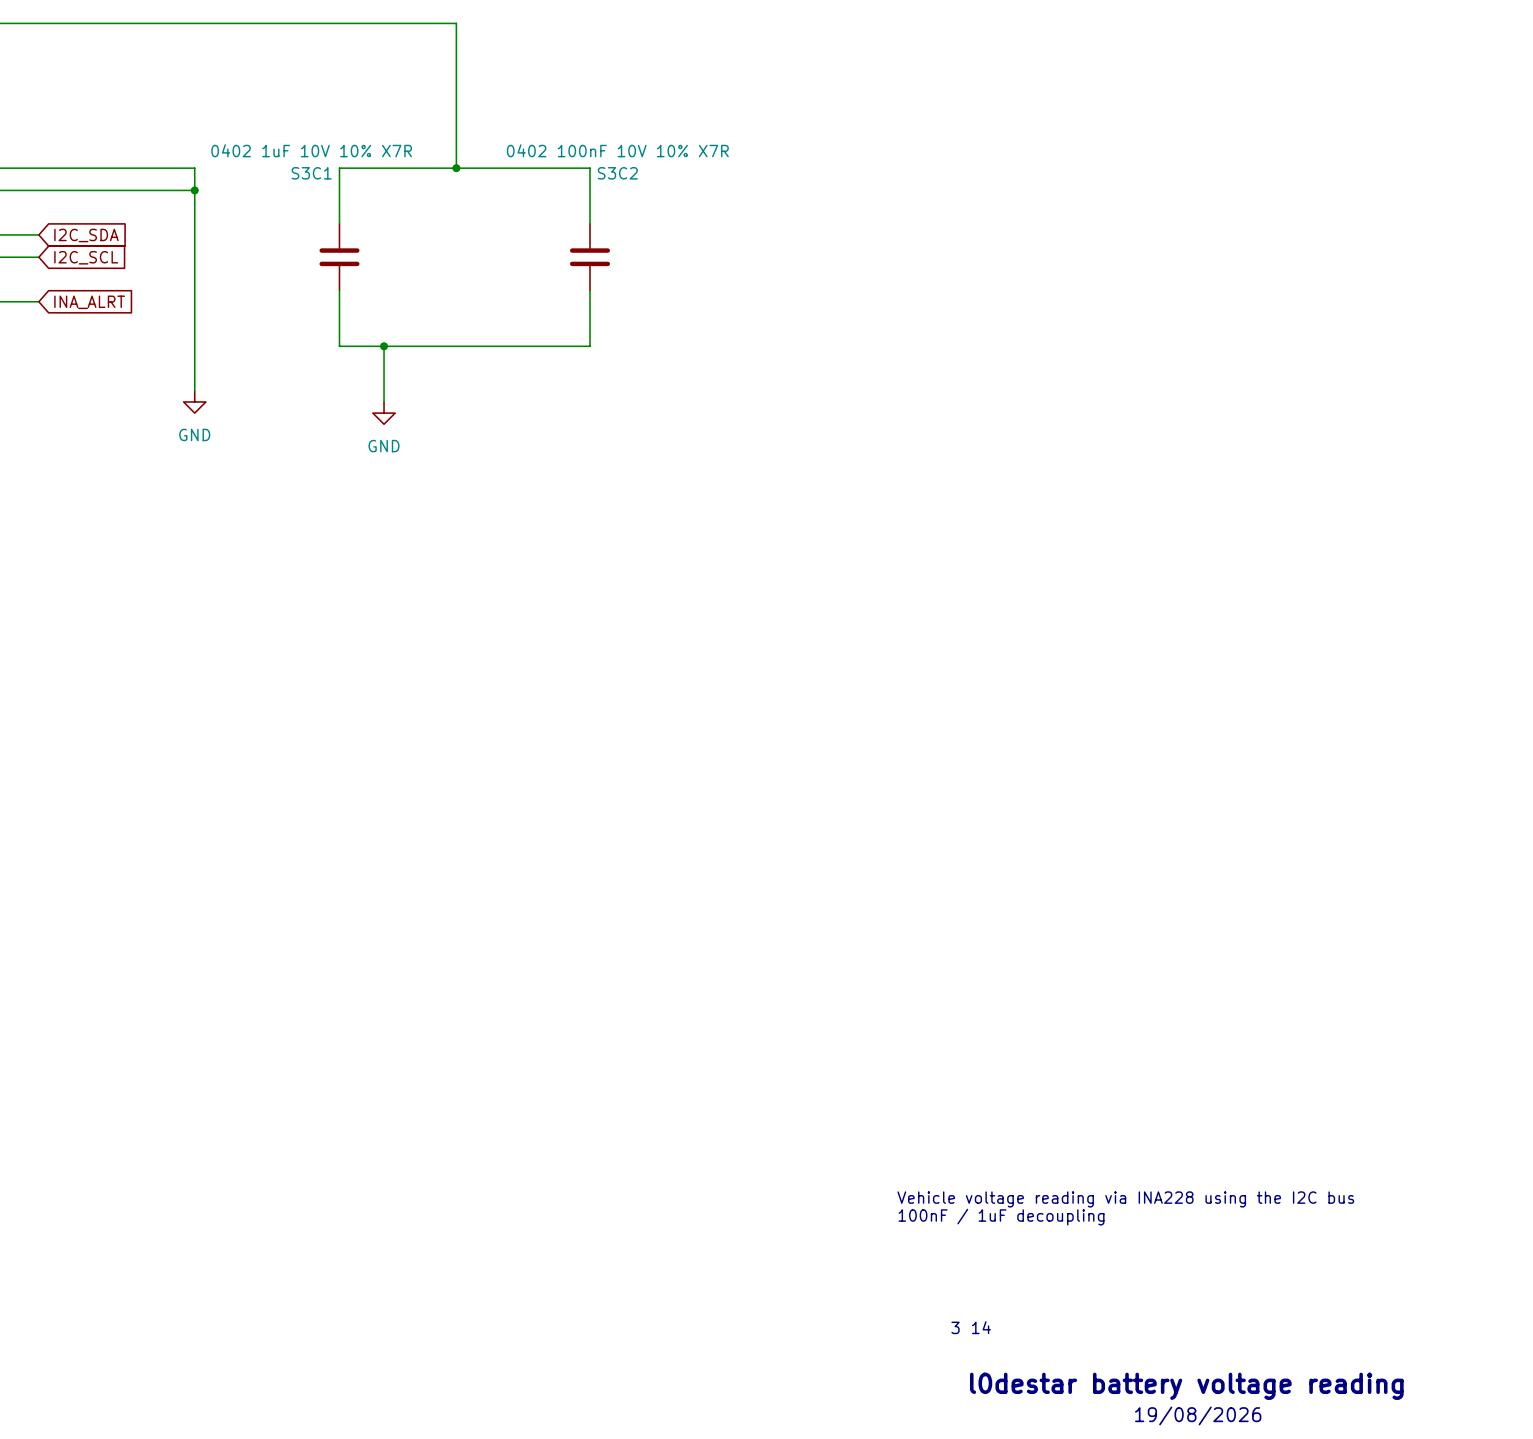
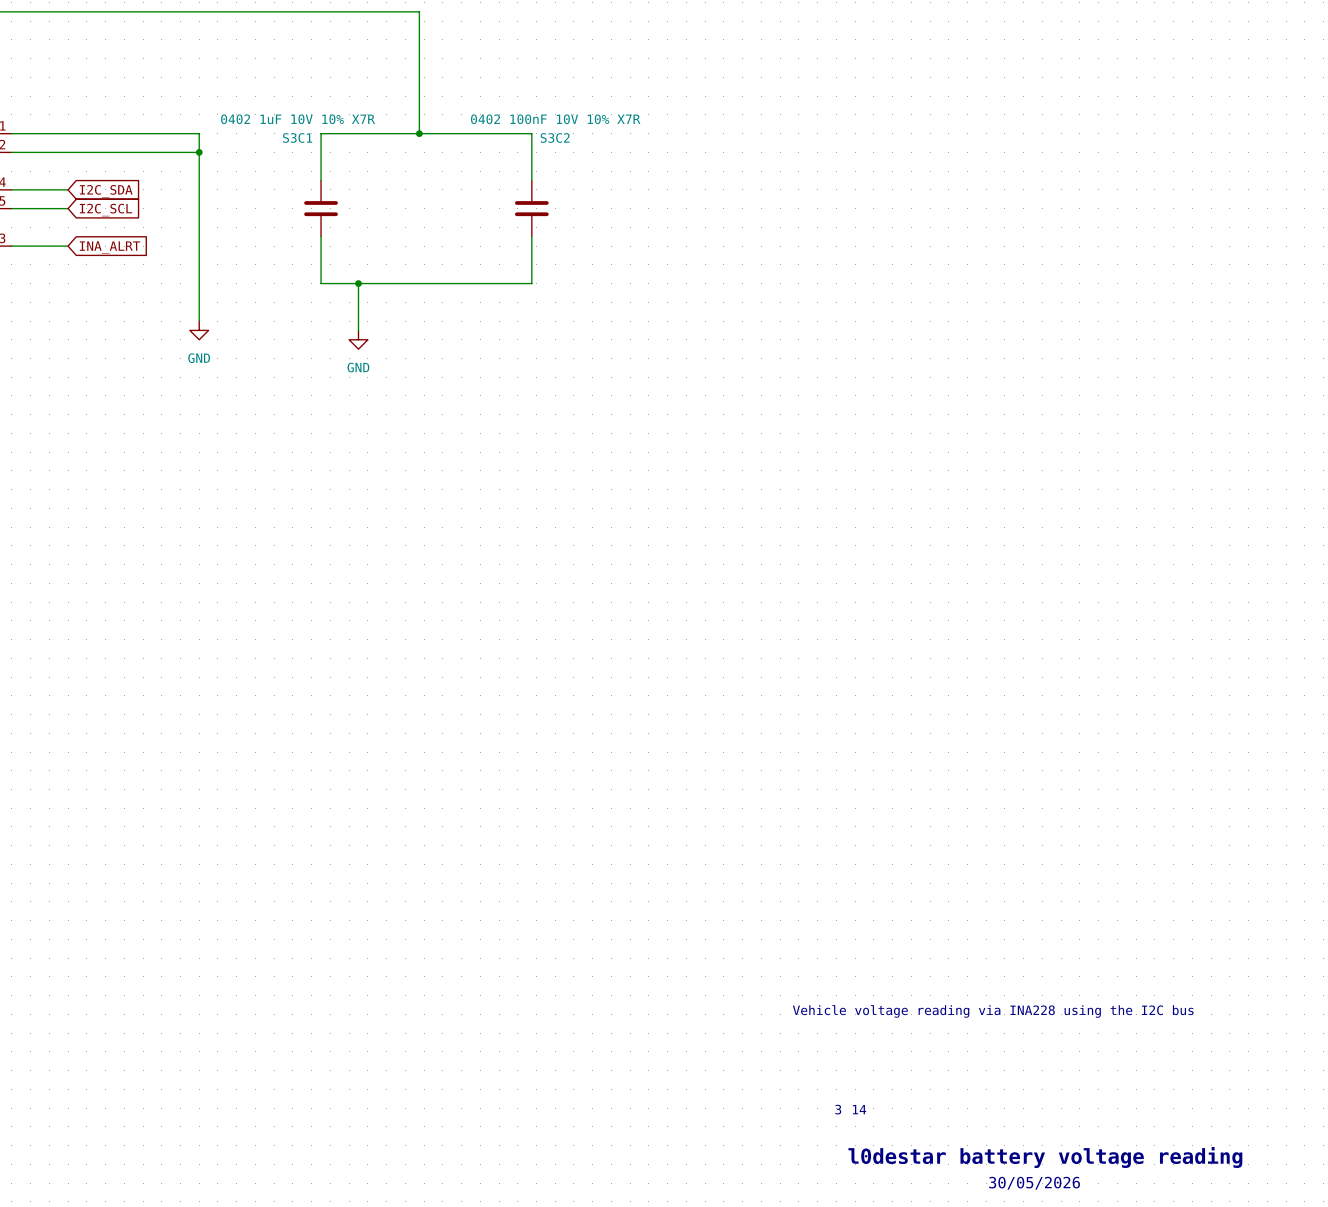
text: Vehicle voltage reading via INA228 using the I2C bus (1125, 1199) -> none
text: none -> Vehicle voltage reading via INA228 using the I2C bus (993, 1011)
text: 100nF / 1uF decoupling (1001, 1217) -> none
text: 19/08/2026 (1198, 1415) -> 30/05/2026 (1034, 1183)

